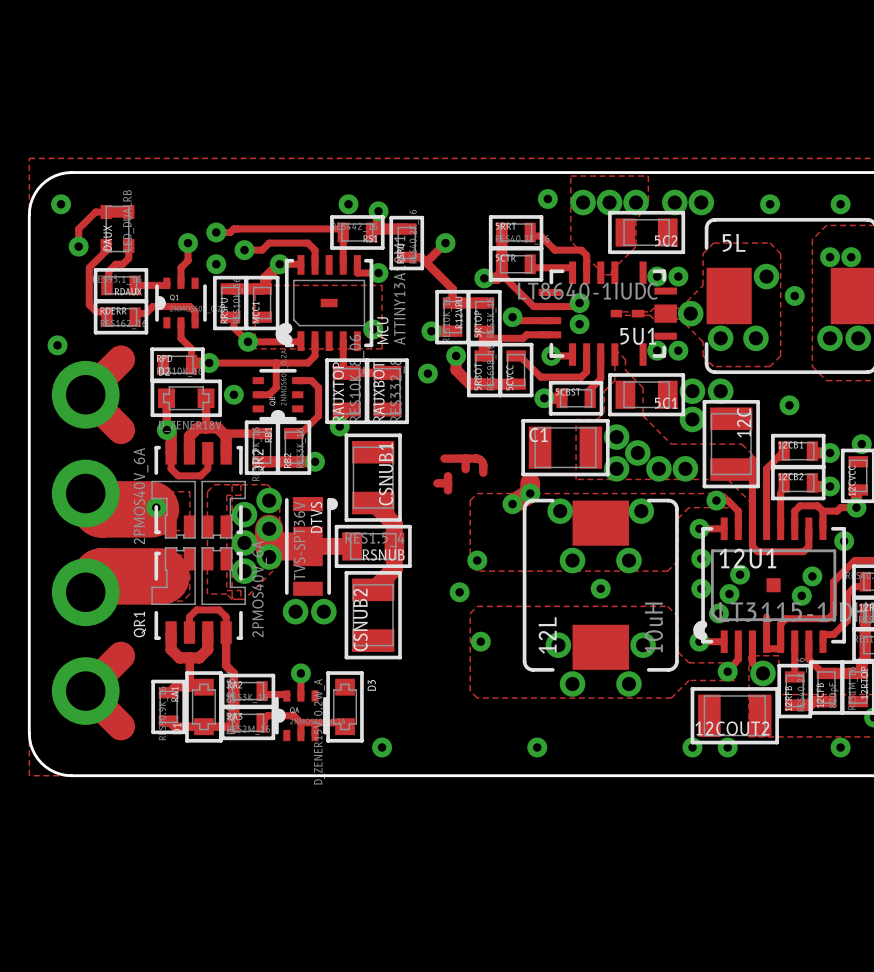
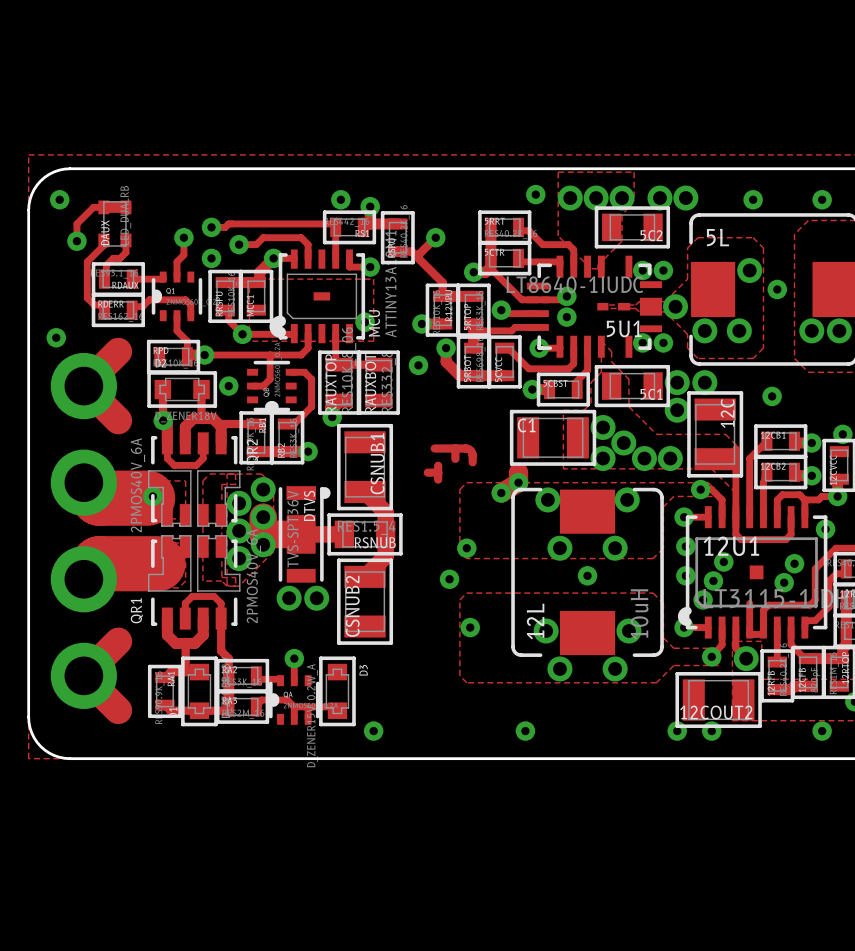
via: (830, 257) -> none
via: (851, 257) -> none

